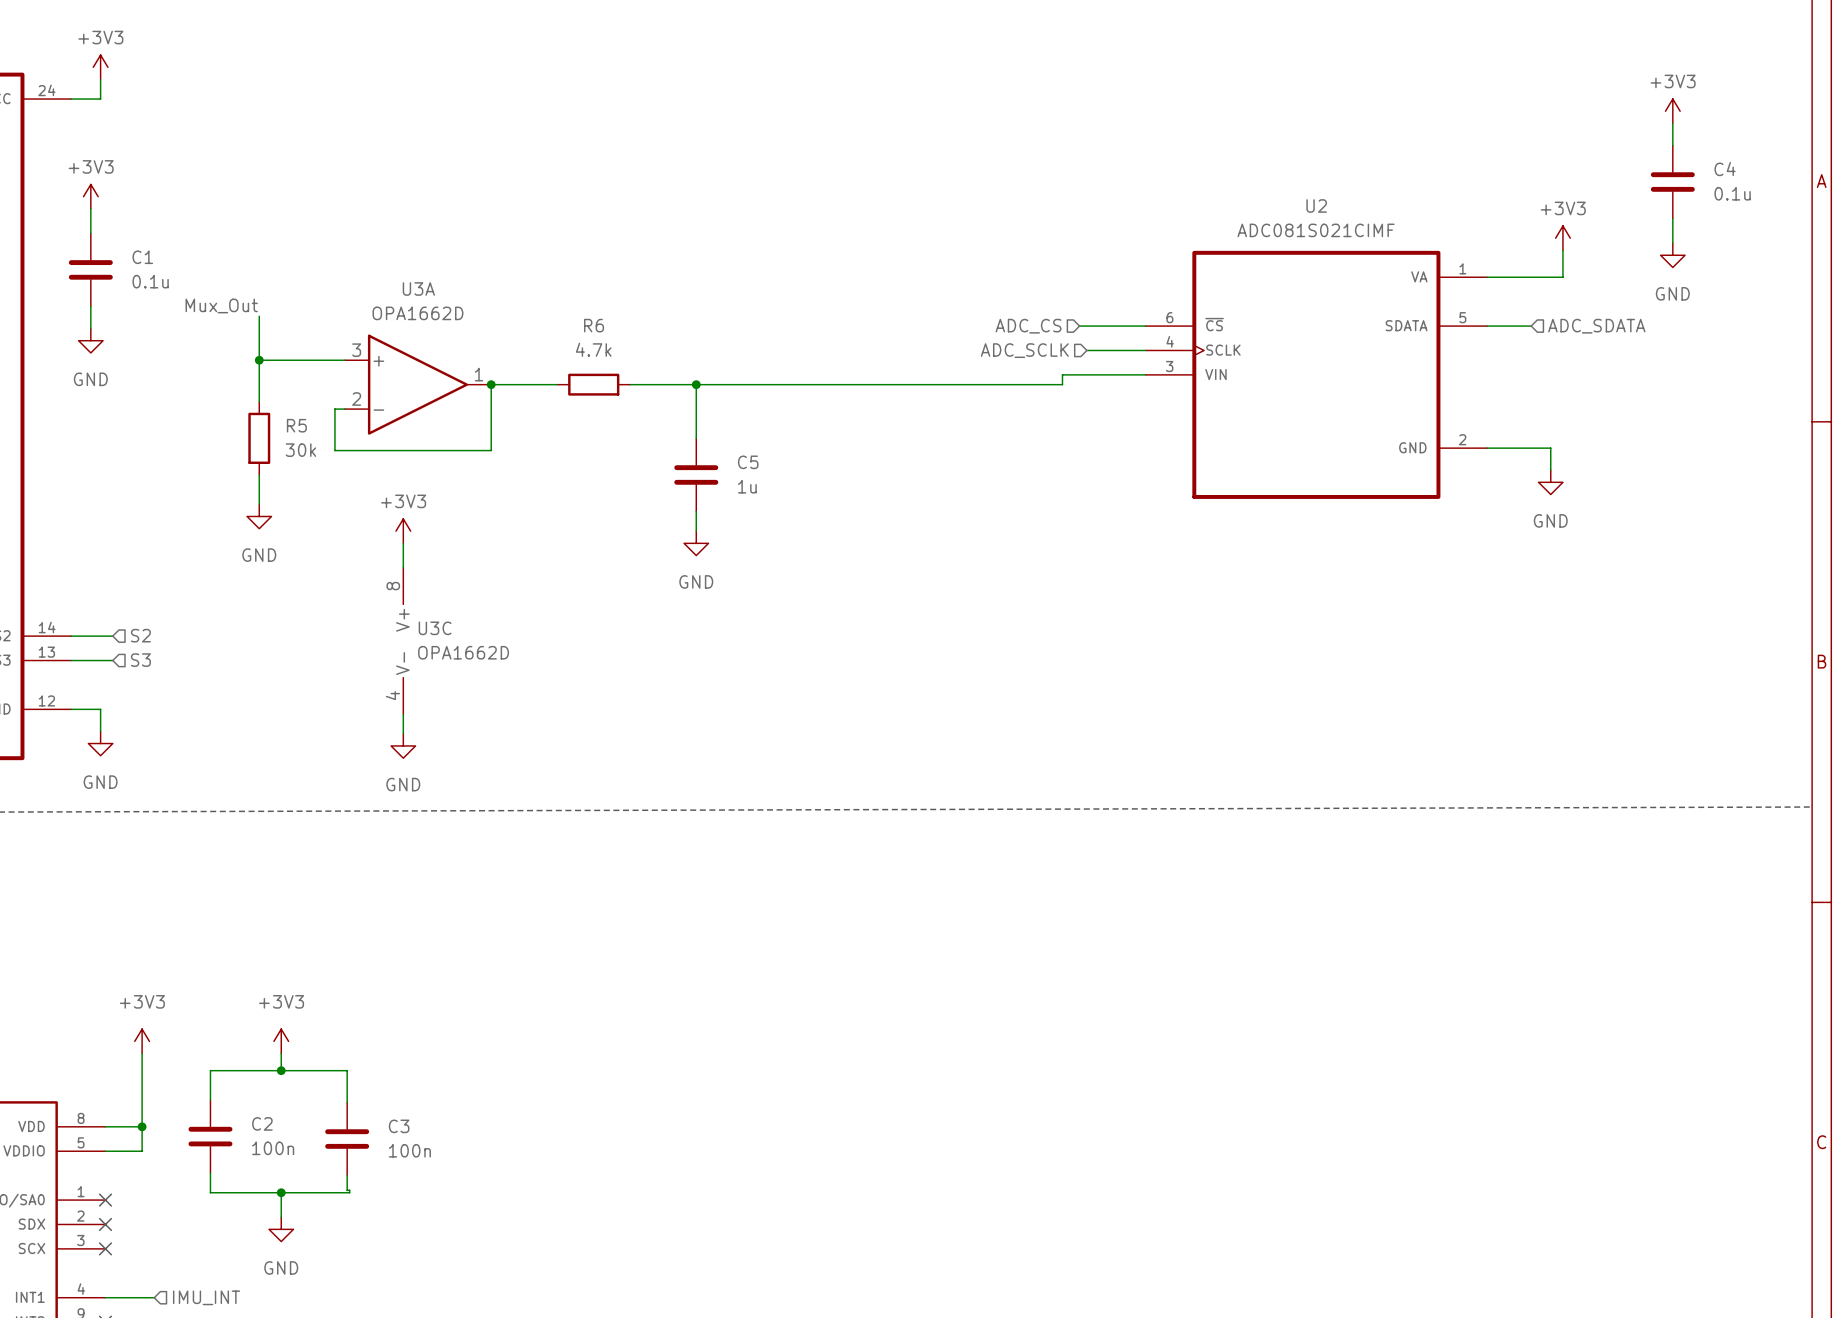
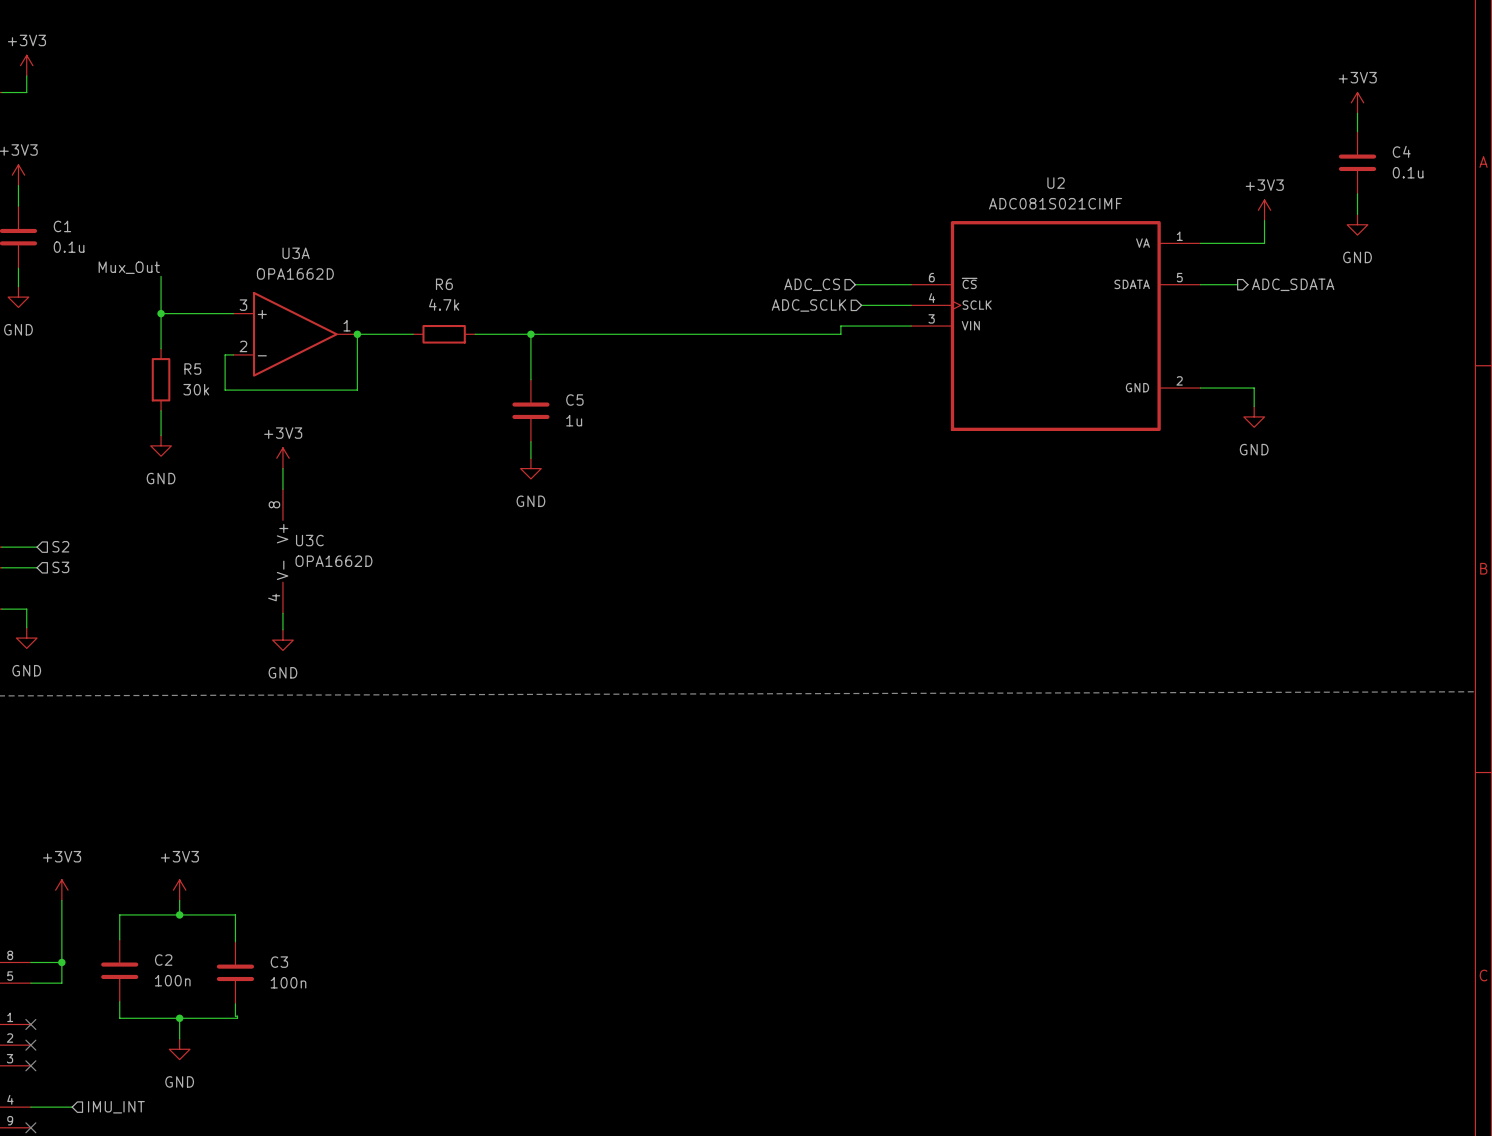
hierarchical label shape: input (1596, 326) -> output (1293, 284)

